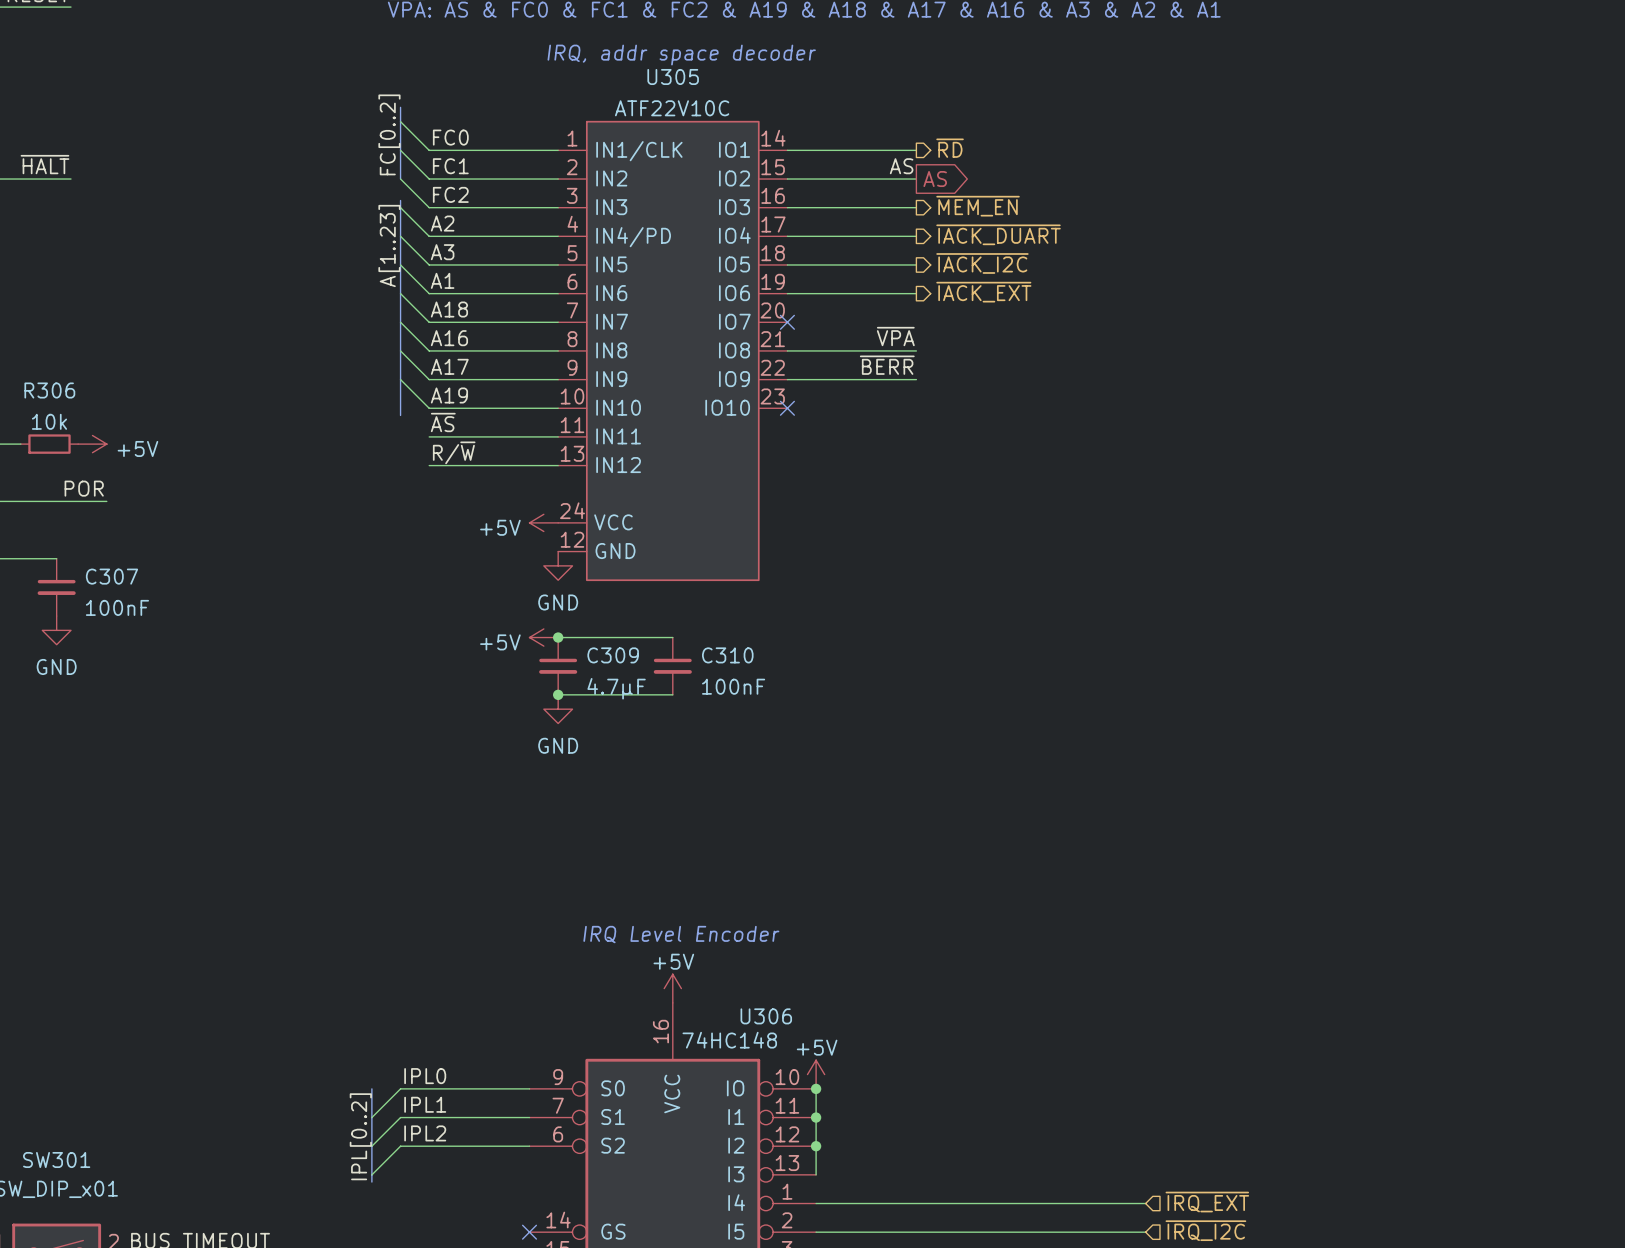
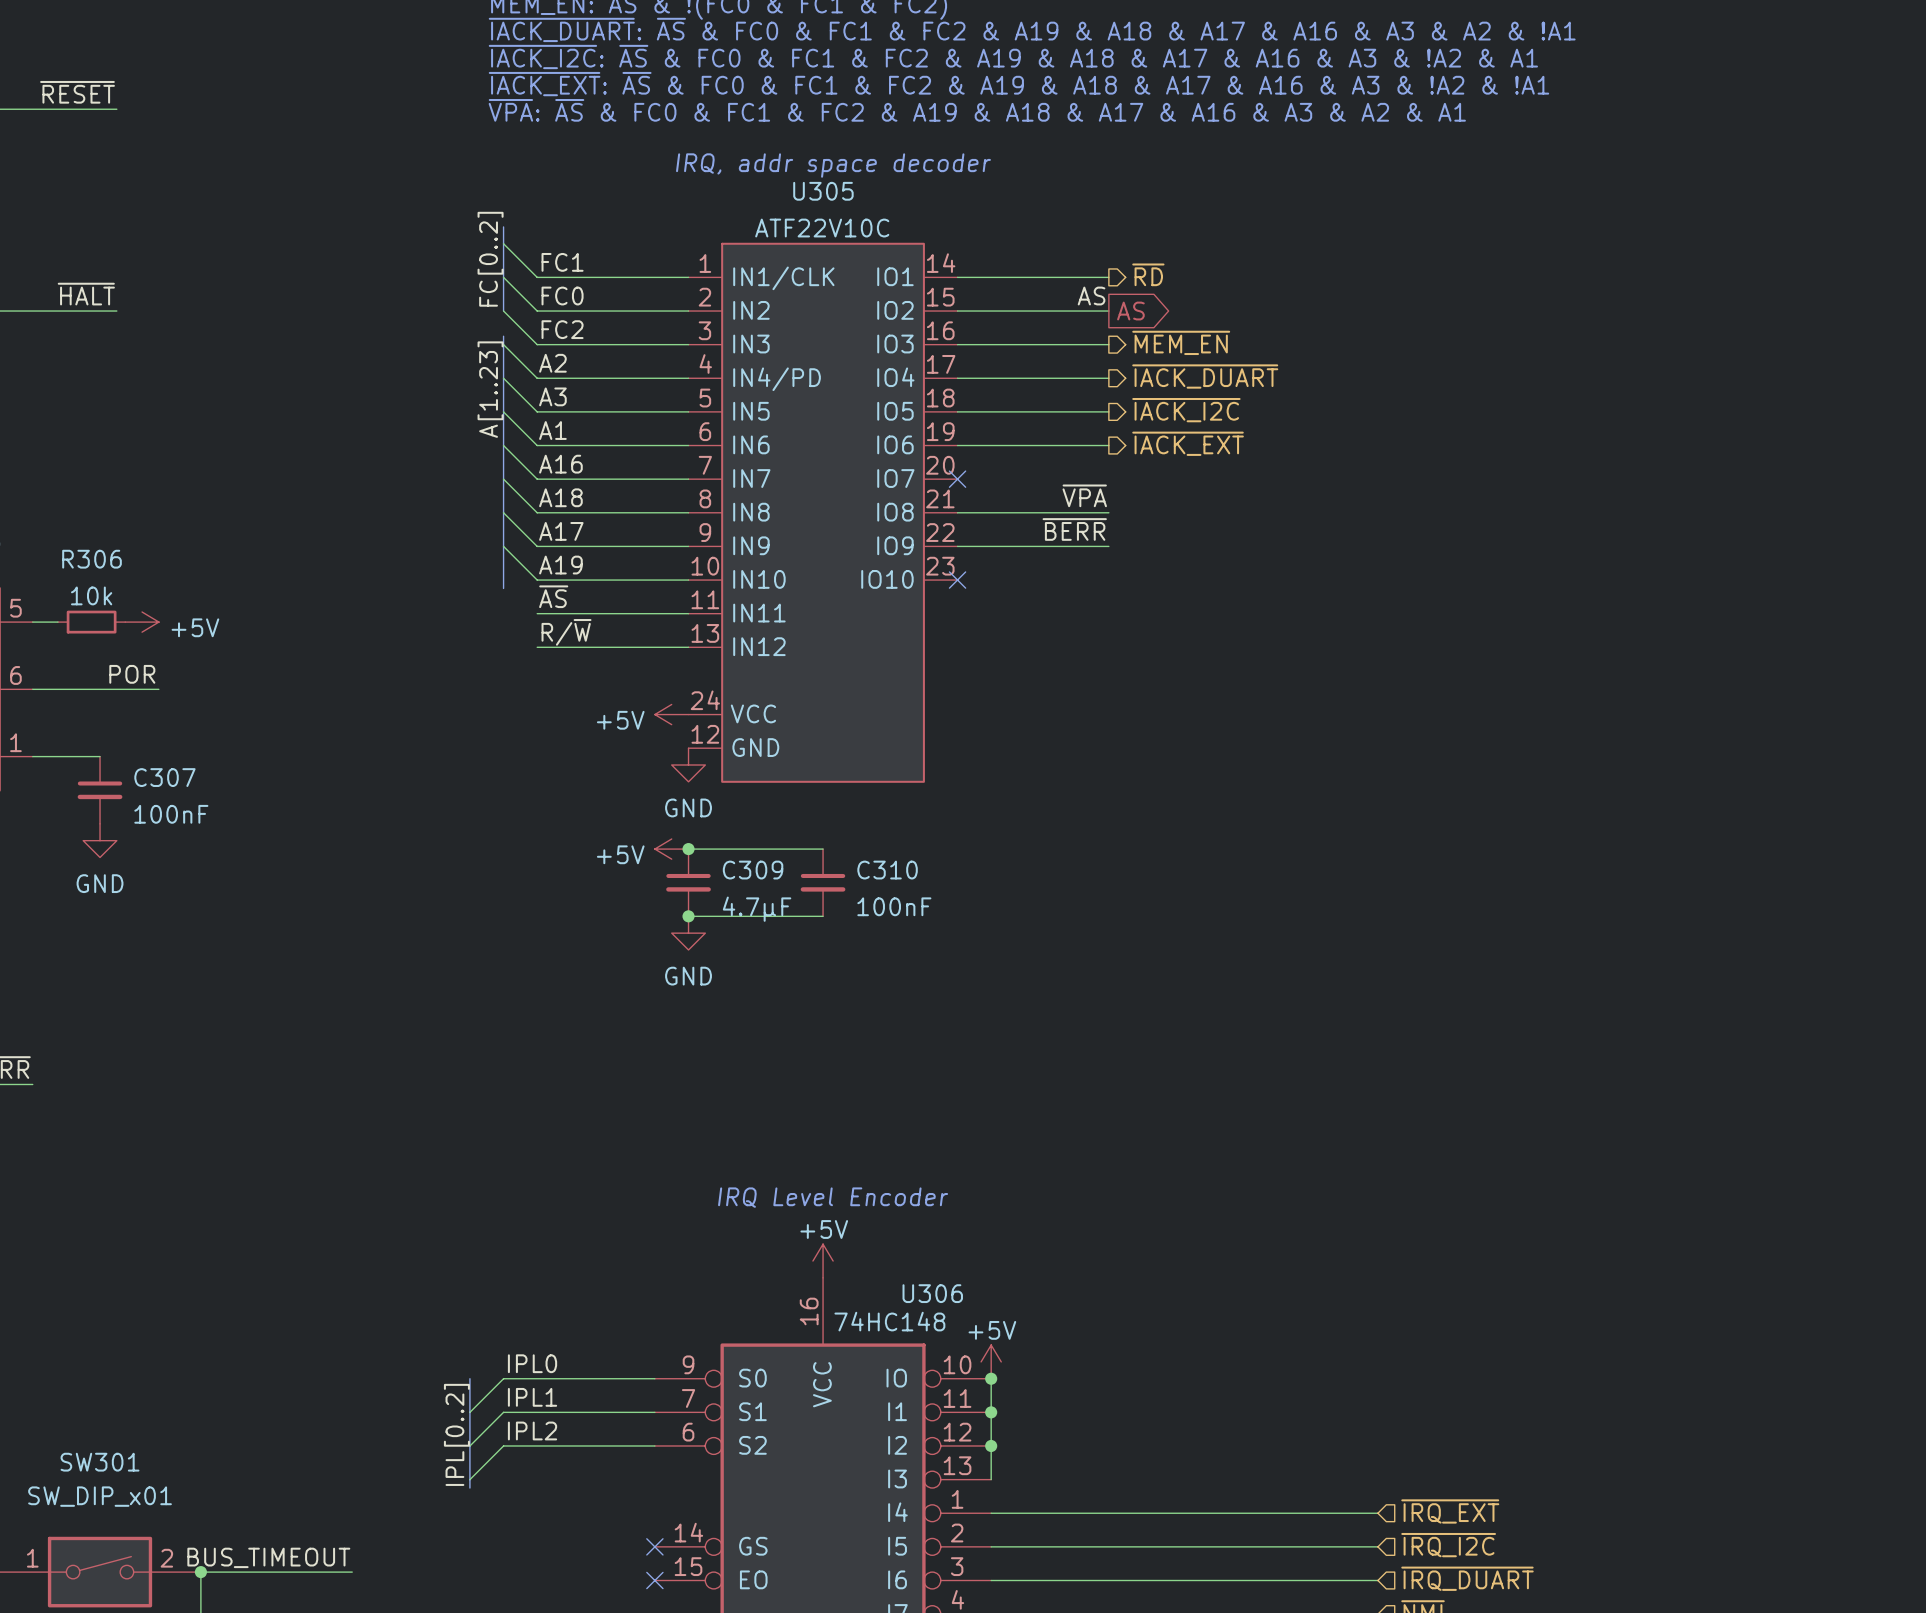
label: FC0 (450, 137) -> FC1 (562, 262)
label: FC1 (450, 166) -> FC0 (562, 296)
label: A18 (449, 309) -> A16 (560, 464)
label: A16 (449, 338) -> A18 (560, 497)

